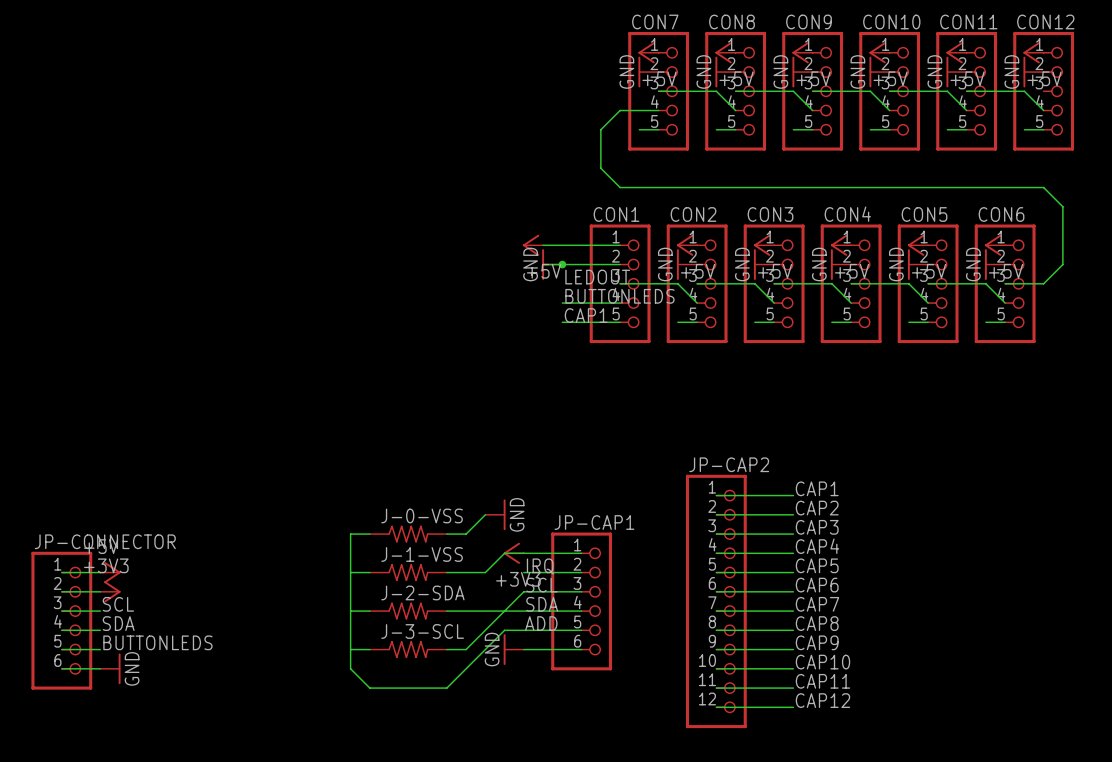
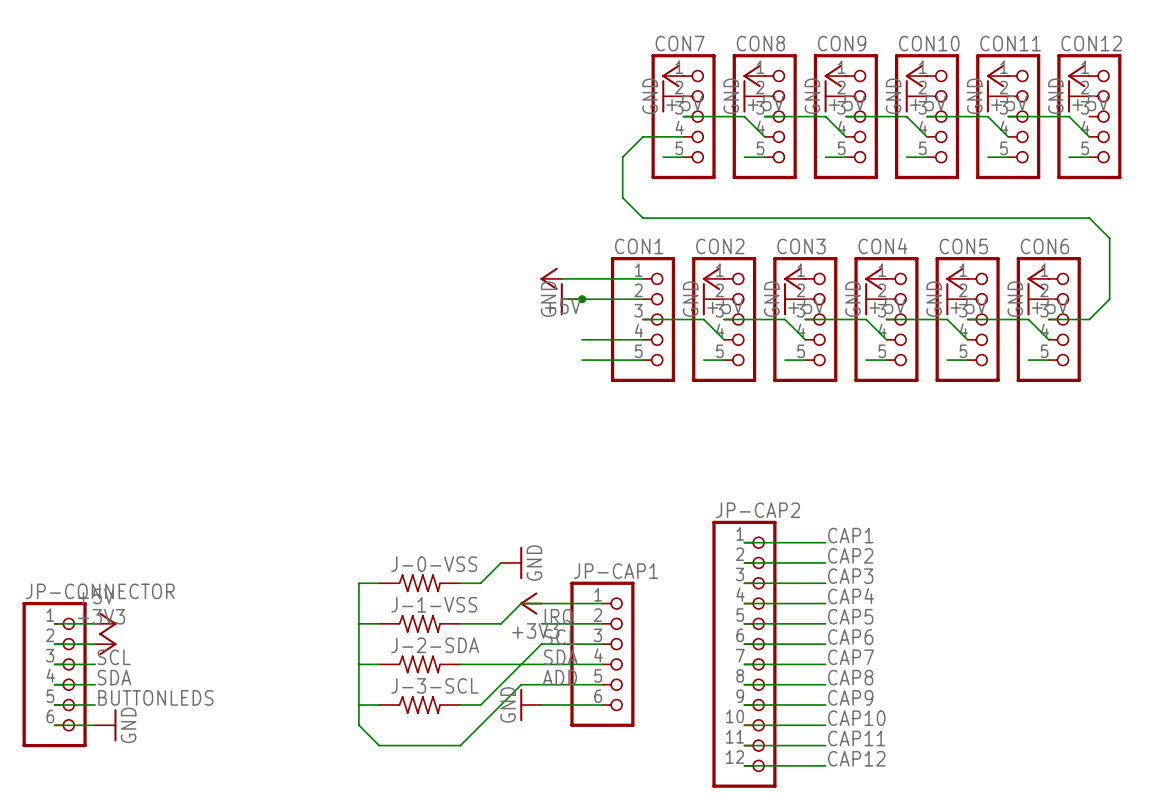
label: LEDOUT (597, 277) -> none
label: BUTTONLEDS (619, 296) -> none
label: CAP1 (586, 315) -> none

